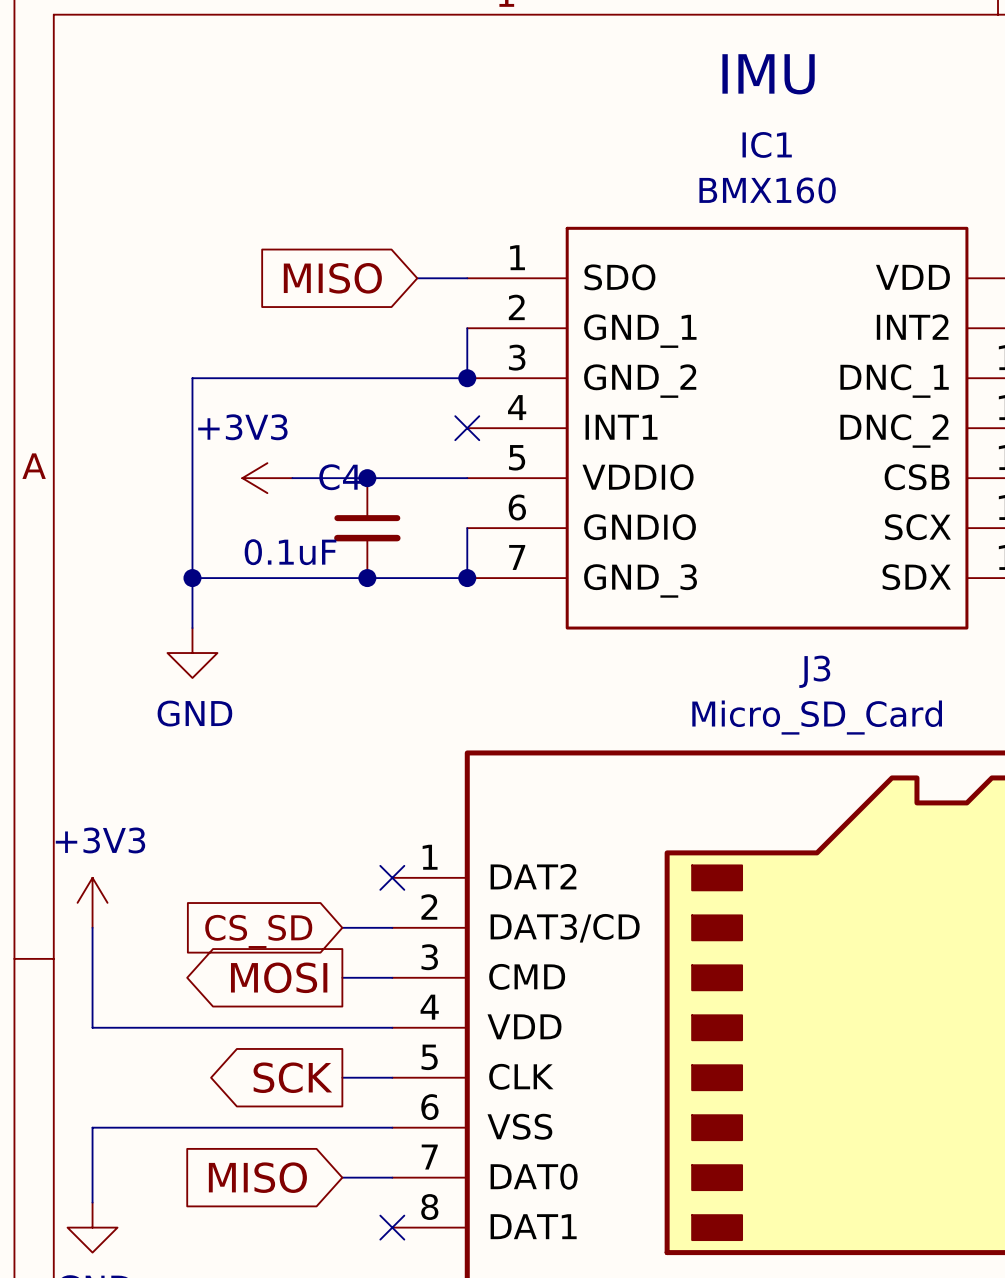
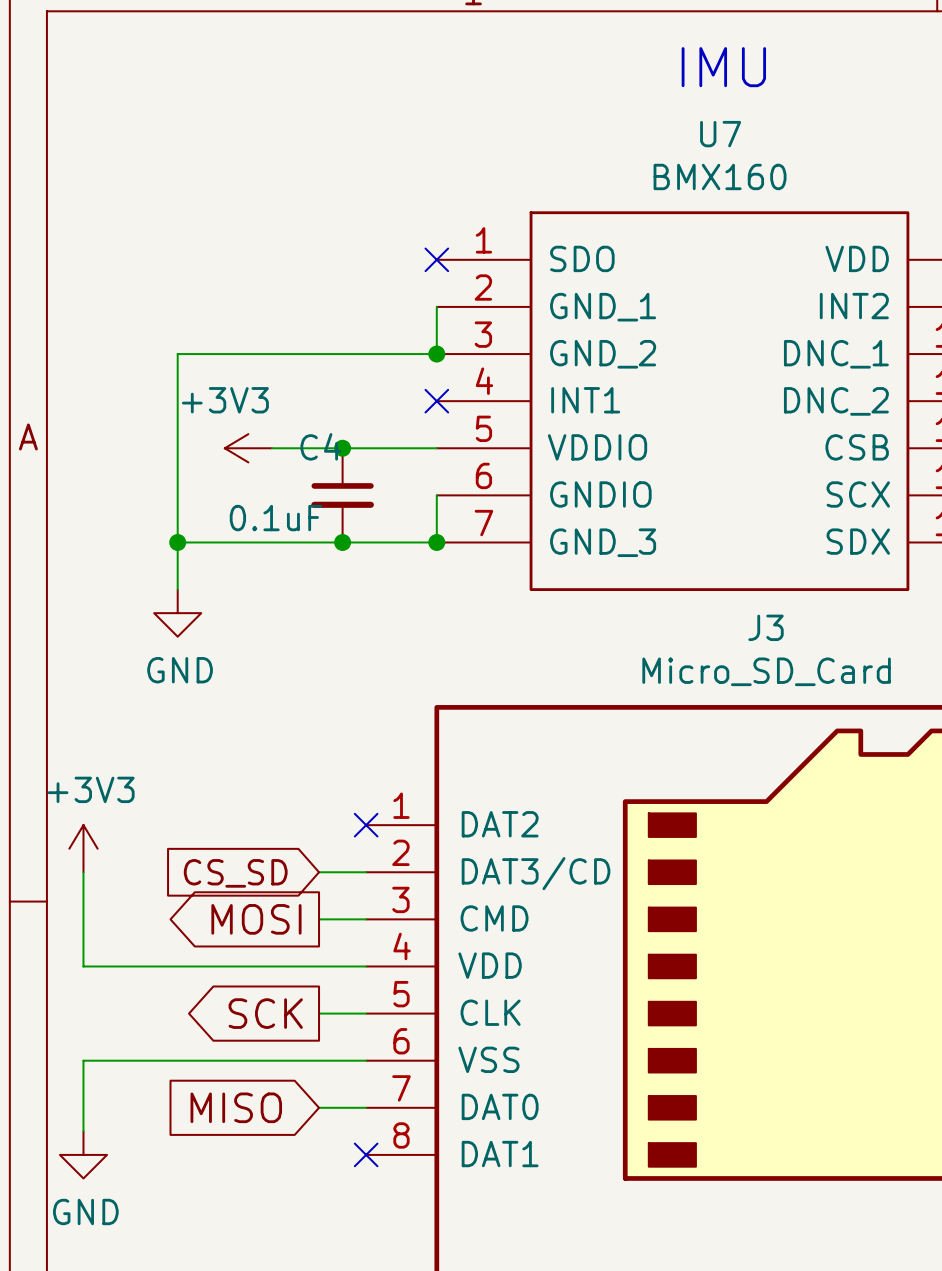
IC1 name: IC1 (767, 144) -> U7 (720, 134)
global label: MISO (332, 278) -> none
wire: (417, 278) (467, 278) -> none
no-connect mark: none -> (436, 259)

